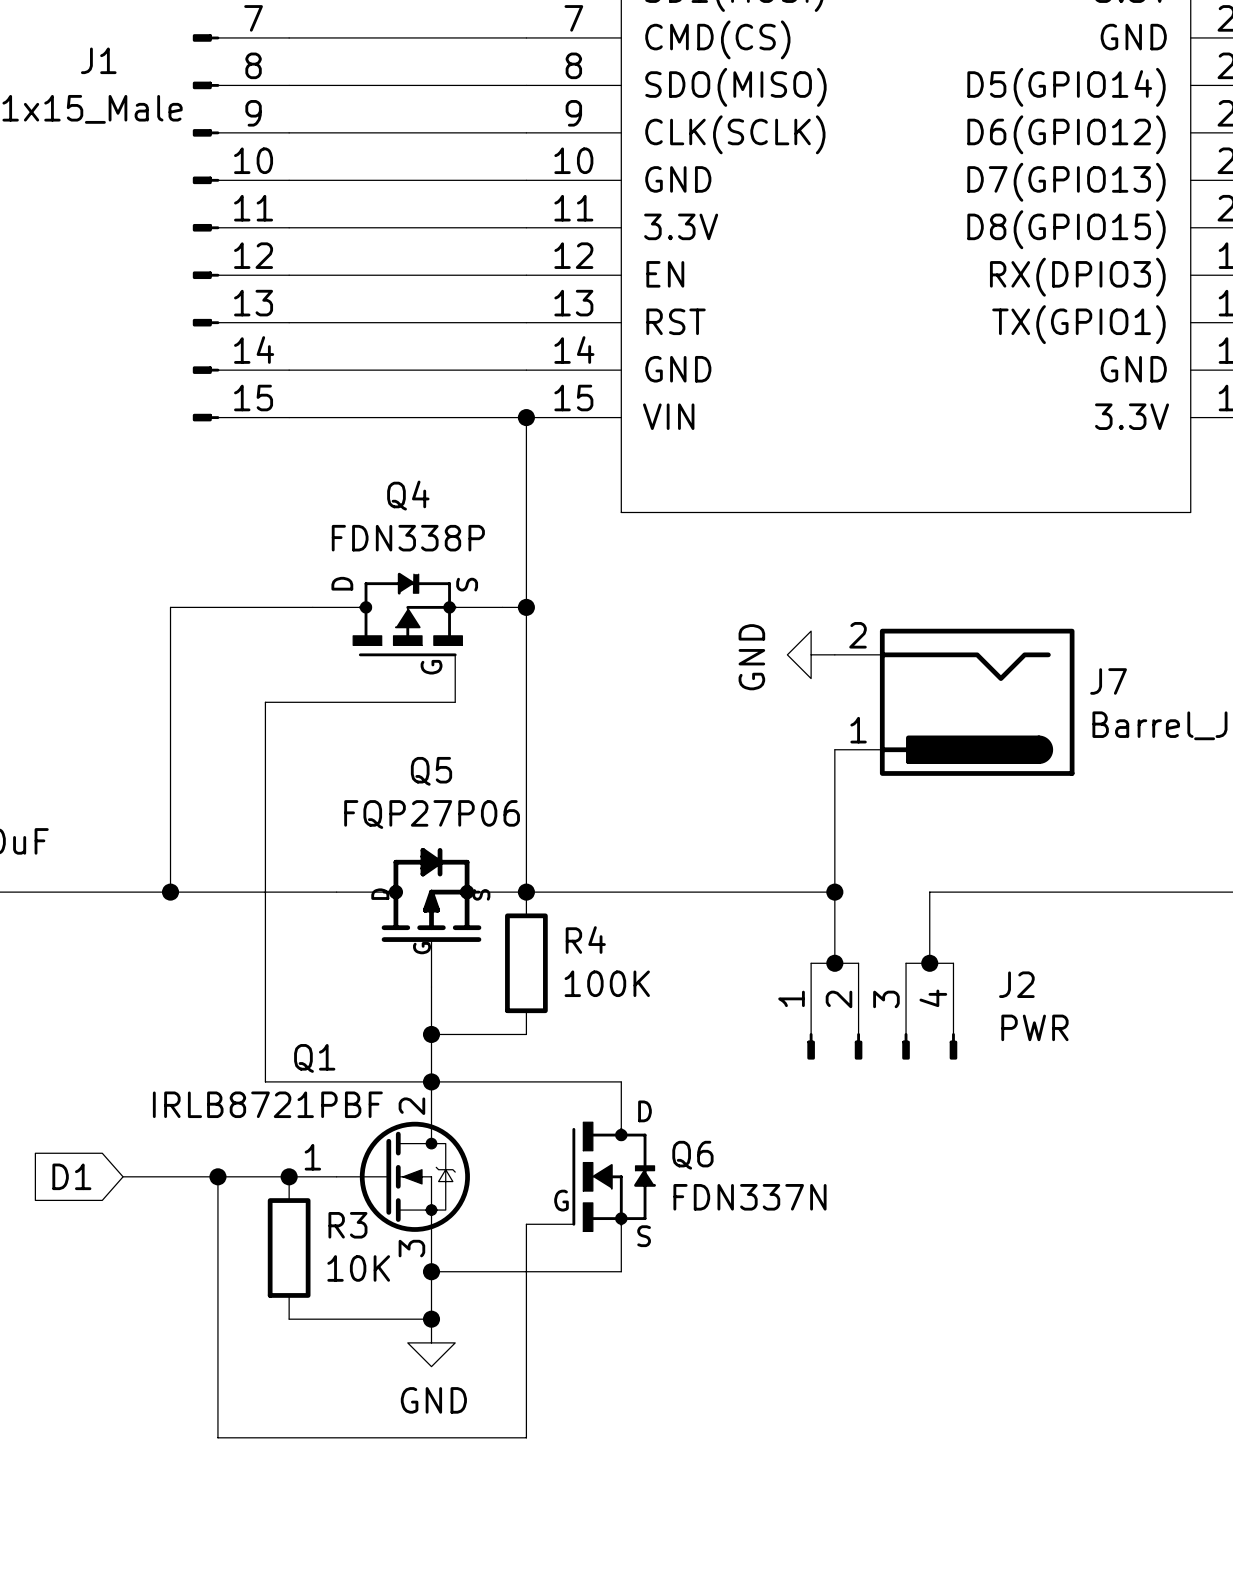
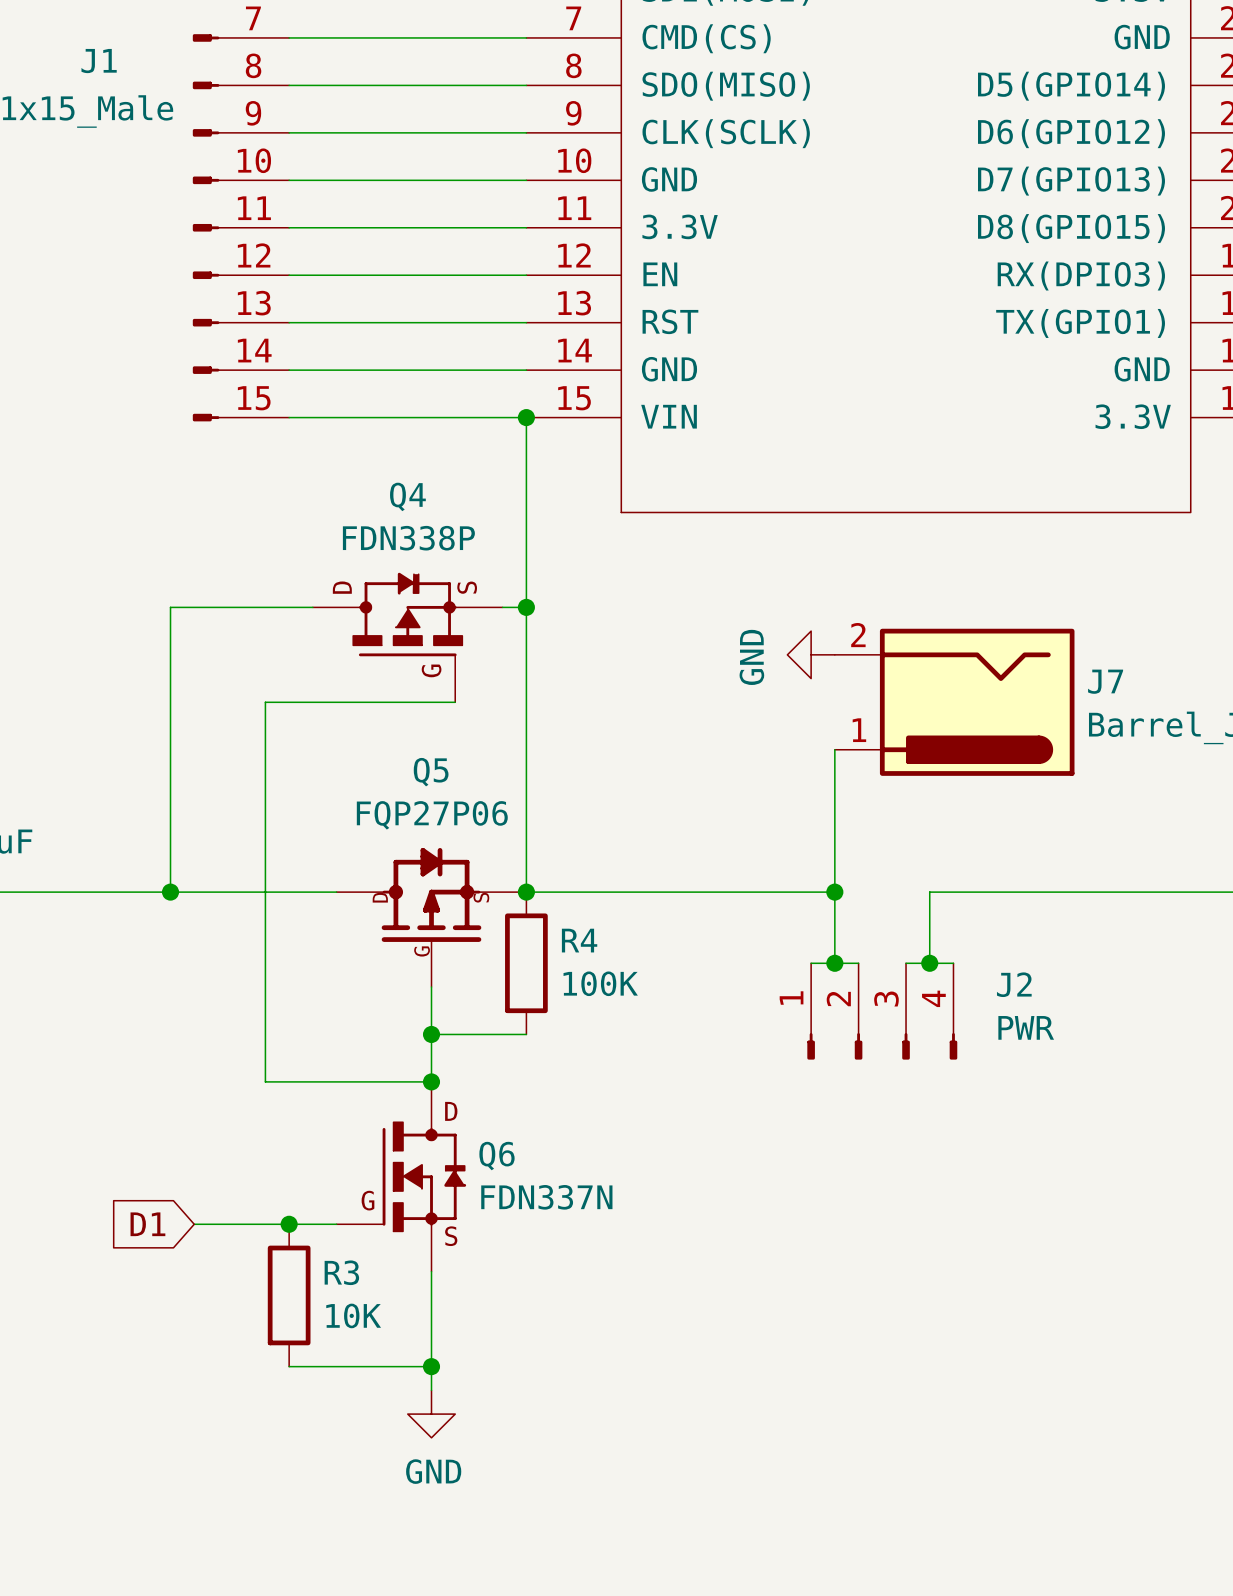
wire: (431, 1081) (621, 1081) -> none
global label position: D1 (71, 1176) -> D1 (147, 1224)
wire: (123, 1176) (289, 1176) -> none
wire: (217, 1176) (217, 1437) (526, 1437) (526, 1224) -> none
junction: (217, 1176) -> none
junction: (289, 1176) -> none
Q1: IRLB8721PBF (379, 1176) -> none
Q6 position: (591, 1176) -> (401, 1176)
wire: none -> (194, 1224) (336, 1224)
junction: none -> (289, 1224)
R3 position: (289, 1248) -> (289, 1295)
wire: (431, 1271) (621, 1271) -> none
junction: (431, 1271) -> none
wire: (289, 1319) (431, 1319) -> (431, 1390) (431, 1319)
junction: (431, 1319) -> none
power symbol position: GND (431, 1342) -> GND (431, 1414)
wire: none -> (289, 1366) (431, 1366)
junction: none -> (431, 1366)

